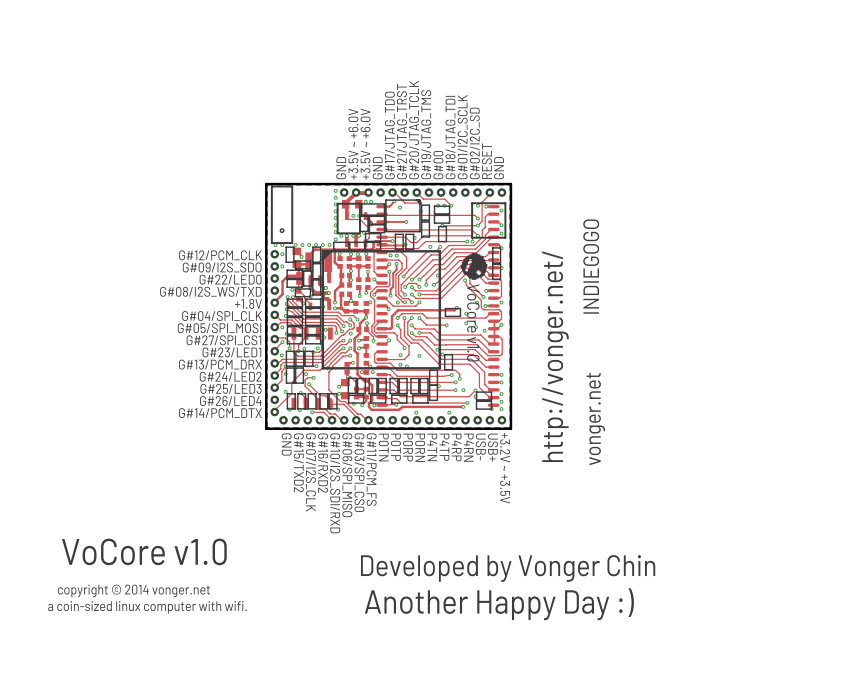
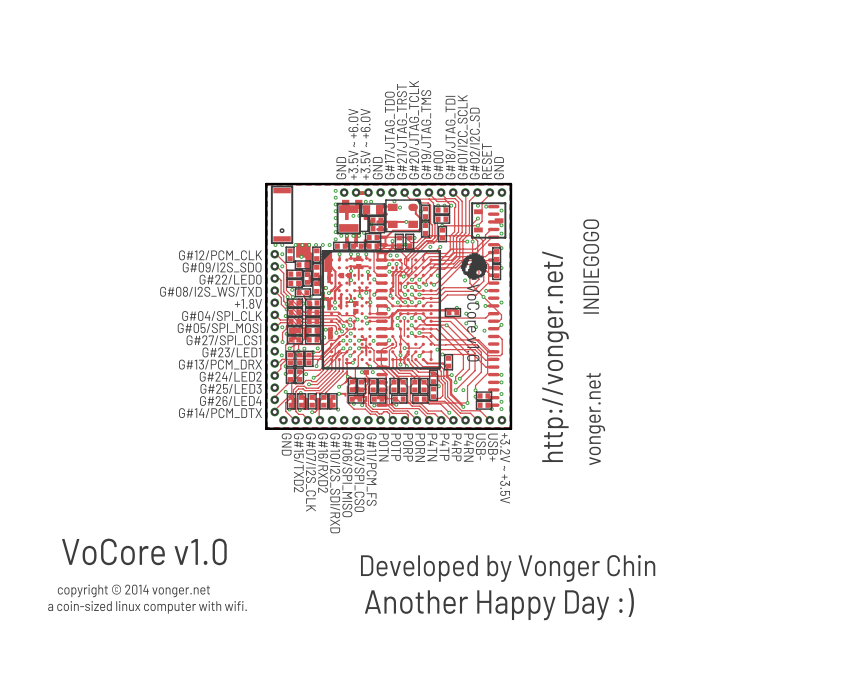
part footprint: [270, 185, 294, 245] -> [270, 185, 294, 245]
track: (356, 192) (345, 203) (346, 218) (360, 219) (369, 228) (369, 237) (365, 243) -> none
track: (392, 192) (404, 202) (420, 202) -> (408, 267) (404, 264) (404, 258) (425, 238) (432, 236) (430, 205) (428, 202) (420, 202)
track: none -> (428, 192) (437, 201) (452, 201) (455, 203) (454, 231) (450, 236) (450, 249) (446, 253) (425, 253) (423, 260)
track: none -> (453, 192) (462, 201) (462, 232) (456, 237) (456, 255) (451, 260) (431, 260)
track: none -> (465, 192) (465, 233) (459, 239) (459, 257) (453, 263) (429, 263) (423, 267)
track: none -> (477, 192) (469, 201) (469, 233) (462, 240) (462, 260) (455, 267) (431, 267)
track: (417, 193) (423, 199) -> (404, 192) (409, 199) (423, 199)
part footprint: [385, 199, 421, 233] -> [385, 199, 421, 233]
track: none -> (429, 199) (433, 203) (434, 237) (432, 240) (426, 240) (408, 260)
track: (394, 201) (389, 206) (382, 206) -> none
part footprint: [336, 202, 361, 235] -> [336, 202, 361, 235]
part footprint: [471, 202, 507, 239] -> [471, 202, 507, 239]
part footprint: [360, 203, 386, 216] -> [360, 203, 386, 216]
part footprint: [420, 204, 431, 221] -> [420, 204, 431, 221]
part footprint: [433, 205, 451, 215] -> [433, 205, 451, 215]
track: none -> (413, 207) (415, 207) (415, 213) (420, 218) (420, 228) (418, 230) (392, 230) (385, 237) (385, 245) (377, 253) (377, 260)
track: (382, 214) (474, 215) (477, 218) -> none
part footprint: [433, 214, 451, 224] -> [433, 214, 451, 224]
track: (493, 214) (487, 214) (485, 217) (482, 237) (474, 245) (448, 245) (439, 254) (429, 256) -> (442, 192) (441, 193) (446, 198) (455, 198) (458, 202) (458, 231) (453, 236) (453, 252) (449, 256) (429, 256)
part footprint: [368, 215, 386, 225] -> [368, 215, 386, 225]
part footprint: [420, 221, 431, 238] -> [420, 221, 431, 238]
part footprint: [368, 224, 386, 234] -> [368, 224, 386, 234]
part footprint: [437, 225, 448, 243] -> [437, 225, 448, 243]
track: (382, 229) (471, 229) (477, 235) -> (423, 305) (427, 302) (440, 302) (447, 294) (476, 294) (488, 282) (488, 264) (482, 258) (482, 240) (477, 235)
part footprint: [364, 232, 382, 243] -> [364, 232, 382, 243]
part footprint: [394, 233, 404, 251] -> [394, 233, 404, 251]
part footprint: [405, 233, 415, 251] -> [405, 233, 415, 251]
part footprint: [333, 241, 350, 251] -> [333, 241, 350, 251]
part footprint: [349, 241, 366, 251] -> [349, 241, 366, 251]
part footprint: [364, 241, 382, 251] -> [364, 241, 382, 251]
track: (392, 241) (375, 241) (371, 249) (314, 249) (308, 255) (309, 264) (298, 264) (298, 275) (288, 275) (282, 281) (282, 294) (274, 302) -> (392, 241) (392, 247) (385, 254) (385, 260)
part footprint: [285, 246, 295, 263] -> [285, 246, 295, 263]
part footprint: [312, 246, 322, 263] -> [312, 246, 322, 263]
part footprint: [492, 247, 502, 264] -> [492, 247, 502, 264]
track: (334, 249) (334, 262) (341, 266) (341, 285) -> none
part: none -> (303, 250)
part footprint: [321, 250, 442, 370] -> [321, 250, 442, 370]
track: none -> (274, 254) (286, 264) (286, 290) (292, 297)
part: (296, 257) -> none
part footprint: [294, 260, 312, 270] -> [294, 260, 312, 270]
part footprint: [312, 262, 322, 280] -> [312, 262, 322, 280]
part: (340, 262) -> none
part: (349, 262) -> none
part: (367, 262) -> none
part footprint: [492, 263, 502, 281] -> [492, 263, 502, 281]
track: none -> (274, 266) (274, 264) (283, 273) (283, 291) (287, 297)
part footprint: [286, 269, 303, 279] -> [286, 269, 303, 279]
part footprint: [302, 270, 313, 287] -> [302, 270, 313, 287]
track: (389, 271) (389, 285) (376, 286) (370, 292) (370, 296) (374, 300) (374, 323) (371, 326) (371, 332) (376, 336) (382, 336) -> (389, 271) (404, 271) (408, 275) (411, 271) (411, 259) (428, 243) (433, 243) (437, 239) (438, 219)
track: none -> (274, 278) (281, 280) (281, 293) (283, 295) (283, 301) (286, 303) (291, 303)
part footprint: [286, 278, 303, 288] -> [286, 278, 303, 288]
part: (298, 278) -> none
track: (310, 278) (310, 287) (315, 293) (328, 293) -> (331, 267) (335, 271) (335, 286) (328, 293)
part footprint: [312, 279, 322, 296] -> [312, 279, 322, 296]
track: (465, 280) (466, 285) (481, 300) (481, 307) (483, 309) (499, 309) (501, 314) -> (483, 296) (501, 314)
part: (358, 283) -> none
part: (367, 283) -> none
track: (493, 283) (485, 283) (475, 272) (467, 272) (441, 298) (438, 298) -> (477, 218) (472, 224) (472, 235) (477, 241) (477, 260) (483, 266) (483, 281) (473, 291) (445, 291) (438, 298)
part: (345, 285) -> none
part footprint: [294, 288, 312, 298] -> [294, 288, 312, 298]
track: none -> (274, 290) (281, 297) (281, 304) (291, 312)
track: none -> (354, 290) (369, 290) (369, 313) (377, 313) (377, 306) (385, 306)
part: (345, 294) -> none
track: (436, 294) (465, 268) (477, 268) (488, 279) (499, 279) (501, 281) (501, 296) (499, 298) (493, 298) -> (436, 294) (443, 287) (470, 287) (478, 279) (478, 269) (472, 262) (472, 241)
part: (298, 295) -> none
part footprint: [286, 298, 304, 308] -> [286, 298, 304, 308]
part footprint: [304, 298, 322, 308] -> [304, 298, 322, 308]
part footprint: [286, 307, 304, 317] -> [286, 307, 304, 317]
part footprint: [304, 307, 322, 317] -> [304, 307, 322, 317]
part: (346, 307) -> none
part: (366, 307) -> none
part footprint: [444, 307, 462, 318] -> [444, 307, 462, 318]
track: (334, 308) (341, 308) (344, 311) (366, 311) (366, 317) (359, 323) (359, 333) (354, 338) (354, 350) (357, 353) (357, 374) (372, 385) (372, 400) (368, 403) (371, 409) (399, 409) (402, 406) (463, 406) -> (423, 359) (427, 363) (442, 363) (447, 367) (447, 376) (451, 380) (451, 394) (463, 406)
track: none -> (392, 313) (389, 317) (366, 317)
part footprint: [286, 316, 304, 327] -> [286, 316, 304, 327]
part footprint: [304, 316, 322, 327] -> [304, 316, 322, 327]
track: (411, 318) (407, 322) (407, 334) (413, 339) (422, 339) (441, 359) (471, 359) (484, 372) (484, 384) (490, 390) (493, 389) -> (411, 318) (415, 313)
track: (379, 321) (374, 327) (374, 331) (375, 332) (394, 332) (404, 348) -> (423, 344) (419, 348) (404, 348)
track: none -> (431, 321) (450, 321) (481, 352) (481, 372) (467, 386) (467, 403)
track: (367, 323) (366, 329) (373, 337) (373, 340) -> (367, 323) (379, 321)
track: (494, 323) (493, 344) (490, 344) (480, 335) (440, 335) (434, 328) -> none
part footprint: [286, 326, 304, 336] -> [286, 326, 304, 336]
part footprint: [304, 326, 322, 336] -> [304, 326, 322, 336]
part: (362, 329) -> none
part footprint: [286, 335, 304, 345] -> [286, 335, 304, 345]
part footprint: [304, 335, 322, 345] -> [304, 335, 322, 345]
track: none -> (362, 336) (366, 340) (366, 345) (374, 350) (374, 361) (386, 373) (386, 378) (381, 383)
track: none -> (392, 336) (396, 345) (389, 350) (389, 368) (407, 386) (407, 401) (412, 406) (419, 406) (427, 413) (434, 413) (441, 418) (441, 420)
track: none -> (400, 336) (400, 364)
track: (404, 336) (411, 343) (417, 343) (439, 364) (469, 364) (479, 373) (479, 387) (489, 397) (493, 397) -> none
track: (274, 339) (285, 337) (289, 342) (289, 348) -> (339, 336) (335, 340) (329, 340) (325, 344) (295, 344) (289, 348)
track: (350, 340) (346, 344) (341, 344) (323, 362) (283, 362) -> (291, 339) (285, 345) (285, 360) (283, 362)
track: (282, 342) (274, 347) (274, 351) -> (282, 342) (282, 332) (291, 321) (285, 316)
part: (366, 342) -> none
track: none -> (392, 344) (381, 350) (381, 364) (393, 377) (393, 382) (389, 386) (389, 403) (394, 408) (418, 408) (429, 420)
part footprint: [285, 350, 295, 368] -> [285, 350, 295, 368]
part footprint: [295, 350, 305, 368] -> [295, 350, 305, 368]
part footprint: [304, 350, 314, 368] -> [304, 350, 314, 368]
track: none -> (339, 351) (335, 357) (335, 370) (318, 388) (297, 386) (293, 389) (293, 397) (285, 403) (285, 411) (295, 420)
track: none -> (362, 351) (358, 355) (355, 379) (347, 386) (347, 402) (353, 409) (365, 409) (370, 414) (375, 414) (380, 420)
track: (382, 351) (374, 354) (376, 363) (390, 363) (397, 370) (455, 370) (459, 374) (459, 378) -> (415, 328) (419, 324) (439, 324) (469, 354) (469, 369) (459, 378)
track: none -> (392, 351) (396, 357) (396, 367) (400, 370) (412, 370) (428, 386) (430, 401) (444, 401) (465, 420)
track: none -> (408, 351) (404, 357) (406, 366)
track: none -> (415, 351) (411, 355) (411, 360) (420, 369) (438, 369) (441, 371) (441, 379) (445, 383) (445, 397) (460, 413) (470, 413) (477, 420)
part footprint: [443, 353, 454, 371] -> [443, 353, 454, 371]
track: (350, 355) (342, 356) (328, 372) (328, 389) (340, 401) (345, 401) (357, 414) (368, 420) -> (350, 355) (354, 351)
track: none -> (419, 355) (423, 352) (431, 352) (431, 359)
track: none -> (339, 359) (339, 371) (319, 390) (298, 388) (295, 391) (295, 411) (298, 414) (302, 414) (307, 420)
track: none -> (346, 359) (347, 371) (325, 392) (325, 397) (319, 401) (319, 420)
part: (366, 359) -> none
track: (381, 359) (392, 359) -> (453, 420) (450, 420) (441, 411) (428, 411) (421, 403) (413, 403) (410, 400) (410, 386) (414, 382) (414, 378) (410, 373) (399, 373) (392, 367) (392, 359)
track: none -> (408, 359) (418, 372) (433, 372) (438, 376) (438, 380) (442, 384) (442, 395) (440, 398) (433, 398) (433, 396)
track: none -> (415, 359) (422, 366) (441, 366) (443, 369) (443, 378) (447, 381) (447, 396) (461, 410) (480, 410) (489, 420)
track: (316, 366) (285, 366) (281, 371) (281, 380) (274, 387) -> (316, 366) (317, 360) (331, 344)
part footprint: [285, 367, 295, 384] -> [285, 367, 295, 384]
part footprint: [294, 367, 305, 384] -> [294, 367, 305, 384]
track: none -> (327, 368) (316, 381) (306, 380) (302, 383) (295, 383) (288, 379) (288, 383) (274, 397) (274, 399)
part: (347, 368) -> none
part footprint: [428, 369, 439, 387] -> [428, 369, 439, 387]
track: none -> (366, 371) (366, 376) (373, 382) (368, 386) (368, 404) (372, 409) (388, 409) (392, 413) (406, 413) (408, 420) (404, 420)
track: (382, 374) (390, 374) (397, 382) (455, 382) -> (434, 328) (436, 328) (463, 355) (463, 369) (455, 376) (455, 382)
track: (313, 377) (307, 377) (305, 380) (305, 386) (318, 399) (318, 409) (325, 409) (330, 413) (335, 413) (341, 420) (344, 420) -> (313, 377) (323, 370) (323, 362) (335, 353) (335, 348) (339, 344)
part footprint: [347, 377, 357, 395] -> [347, 377, 357, 395]
part footprint: [356, 377, 367, 395] -> [356, 377, 367, 395]
part footprint: [368, 377, 378, 395] -> [368, 377, 378, 395]
part footprint: [377, 377, 387, 395] -> [377, 377, 387, 395]
part footprint: [389, 377, 399, 395] -> [389, 377, 399, 395]
part footprint: [398, 377, 408, 395] -> [398, 377, 408, 395]
part footprint: [410, 377, 420, 395] -> [410, 377, 420, 395]
part footprint: [419, 377, 429, 395] -> [419, 377, 429, 395]
track: none -> (361, 380) (367, 381) (364, 394) (366, 406) (371, 411) (379, 413) (387, 411) (389, 414) (389, 420) (392, 420)
track: none -> (381, 381) (386, 386) (386, 404) (393, 411) (407, 411) (417, 420)
track: (382, 382) (392, 382) (399, 390) (455, 390) -> (446, 325) (475, 353) (475, 370) (455, 390)
track: (309, 384) (320, 395) (325, 395) (330, 400) (330, 404) (343, 404) (356, 416) (356, 420) -> (309, 384) (317, 384) (331, 370) (331, 359)
part footprint: [428, 384, 439, 402] -> [428, 384, 439, 402]
part: (345, 389) -> none
track: (382, 389) (394, 390) (400, 396) (469, 396) (475, 390) -> (423, 321) (427, 317) (453, 317) (487, 351) (487, 373) (475, 385) (475, 390)
part footprint: [475, 391, 493, 401] -> [475, 391, 493, 401]
part footprint: [286, 393, 296, 410] -> [286, 393, 296, 410]
part footprint: [297, 393, 307, 410] -> [297, 393, 307, 410]
part footprint: [307, 393, 317, 410] -> [307, 393, 317, 410]
part footprint: [319, 393, 329, 410] -> [319, 393, 329, 410]
part footprint: [328, 393, 338, 410] -> [328, 393, 338, 410]
part: (366, 393) -> none
part footprint: [347, 394, 365, 404] -> [347, 394, 365, 404]
part footprint: [369, 394, 387, 404] -> [369, 394, 387, 404]
part footprint: [391, 394, 408, 404] -> [391, 394, 408, 404]
part footprint: [412, 394, 429, 404] -> [412, 394, 429, 404]
track: none -> (424, 399) (429, 403) (440, 403) (449, 412)
part footprint: [475, 400, 493, 410] -> [475, 400, 493, 410]
track: (315, 412) (323, 412) (332, 420) -> (315, 412) (316, 401) (312, 397) (316, 393) (321, 393) (342, 371) (342, 355) (346, 351)

